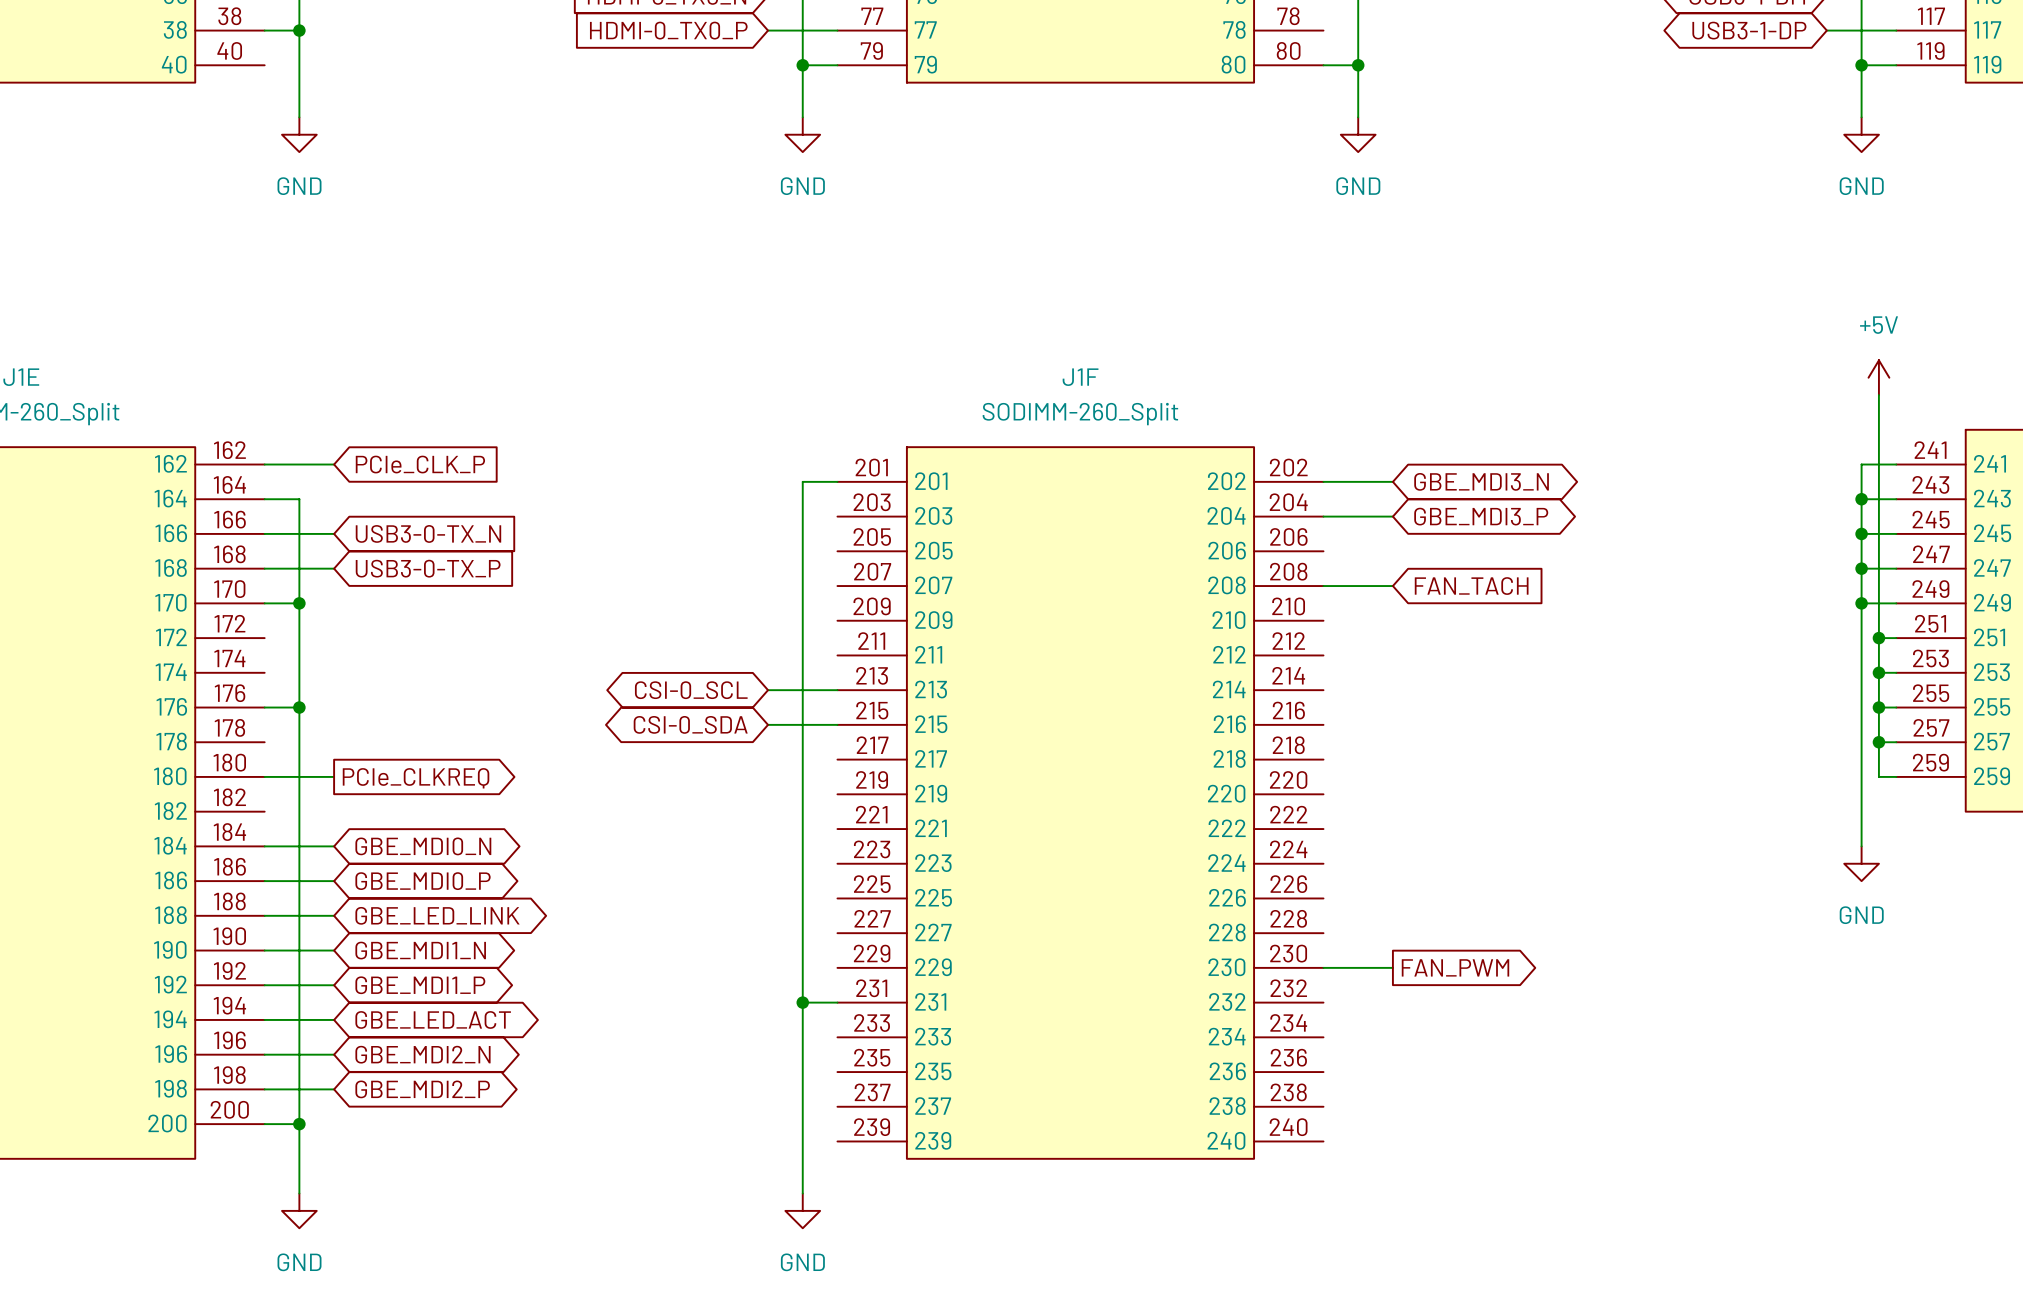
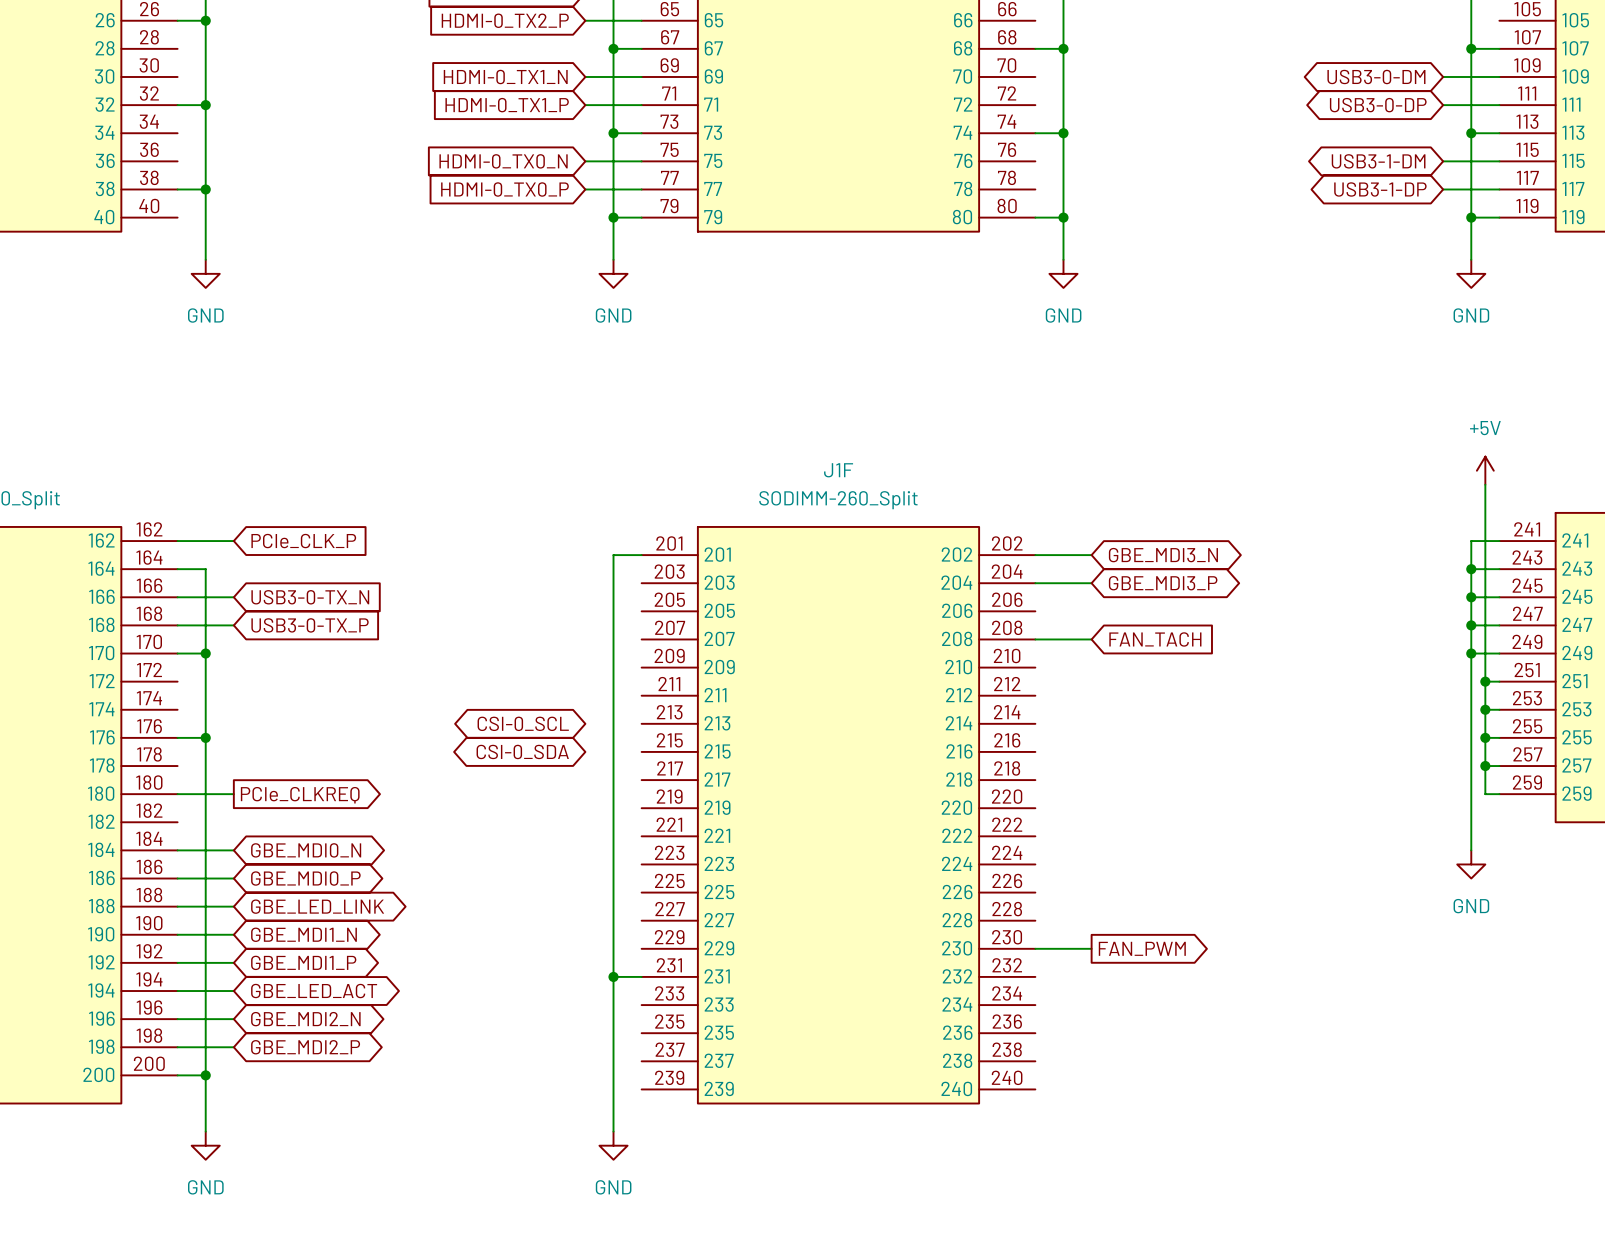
wire: (768, 690) (837, 690) -> none
wire: (768, 724) (837, 724) -> none

